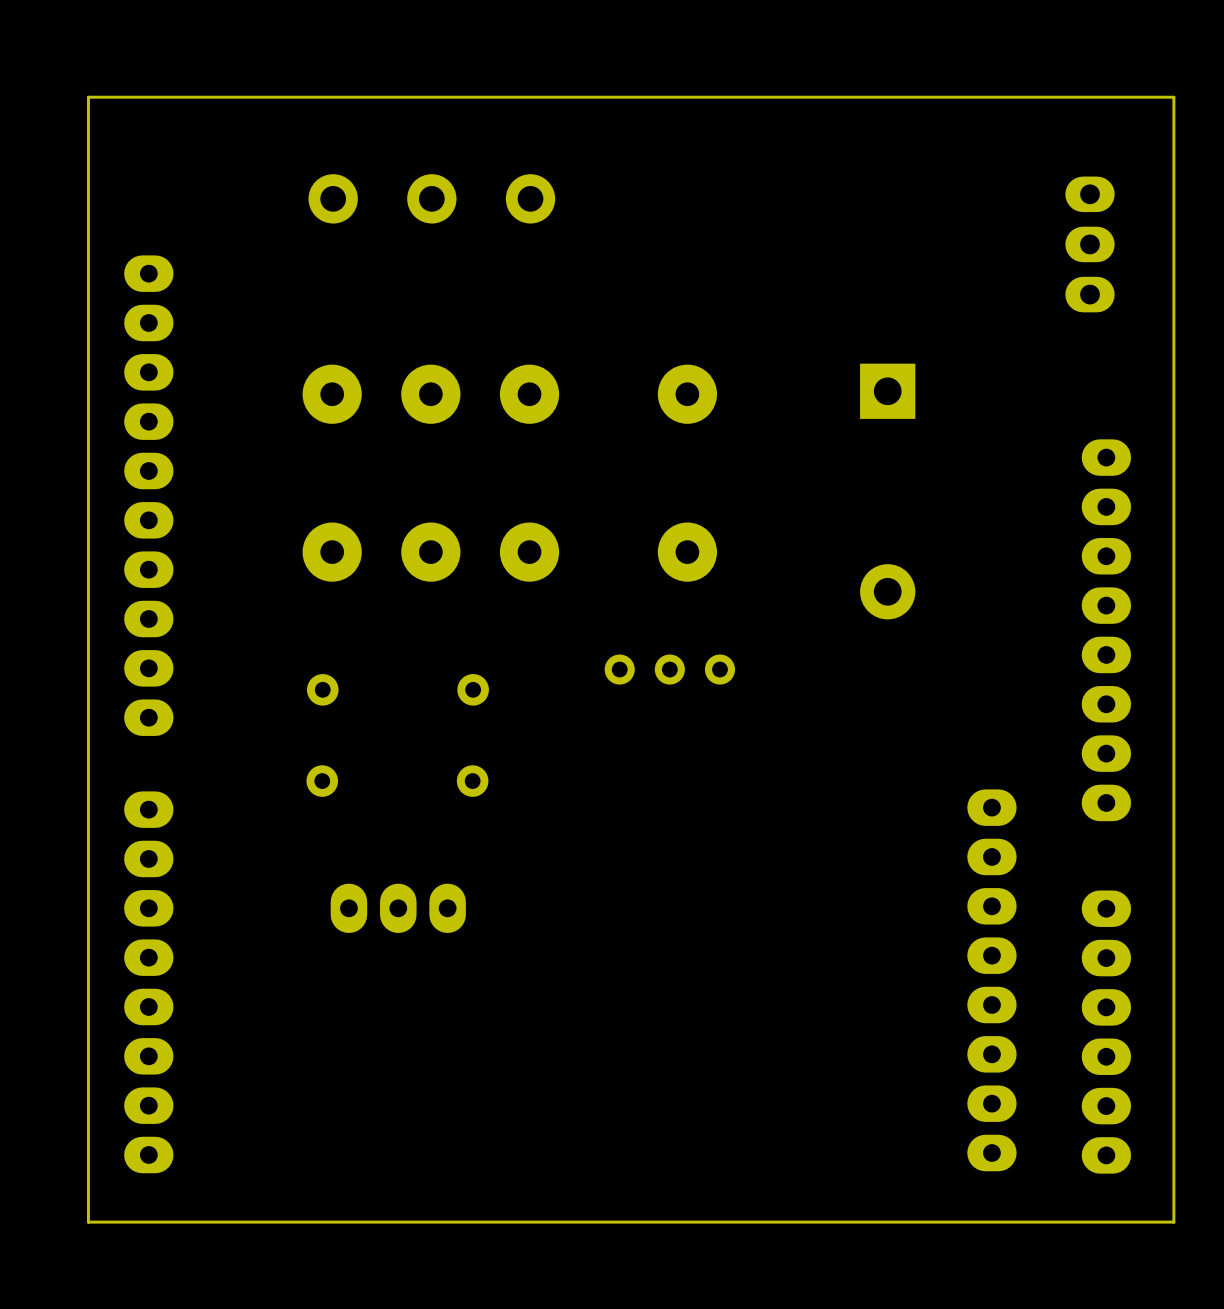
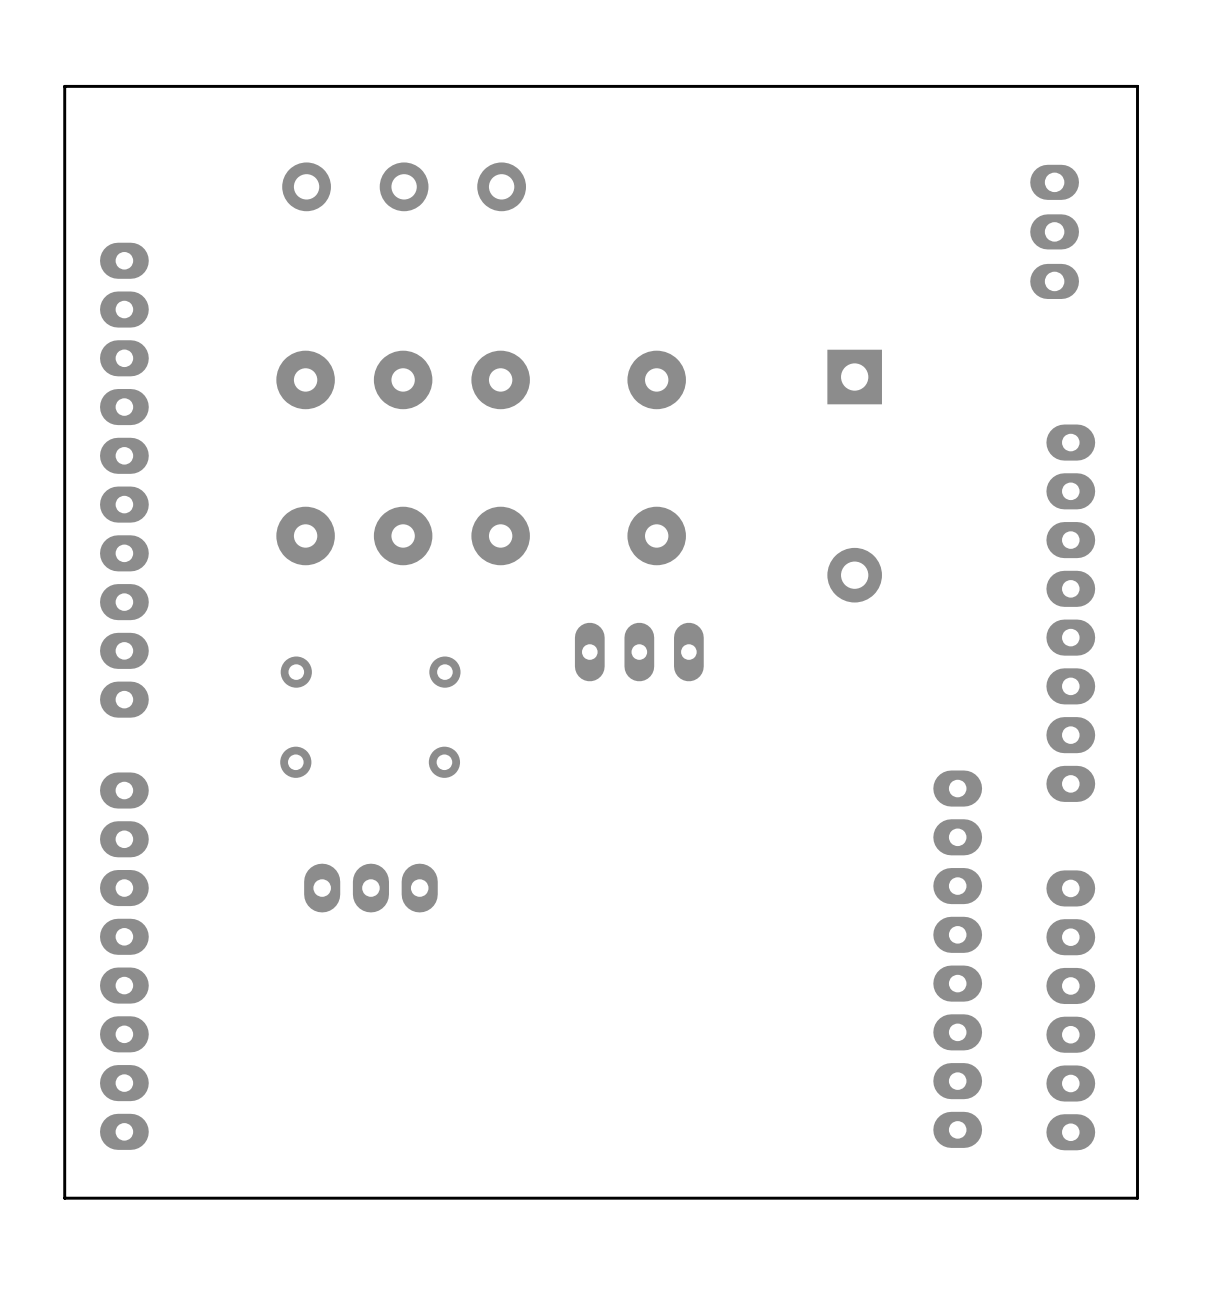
part footprint: [604, 654, 736, 685] -> [574, 622, 704, 682]

